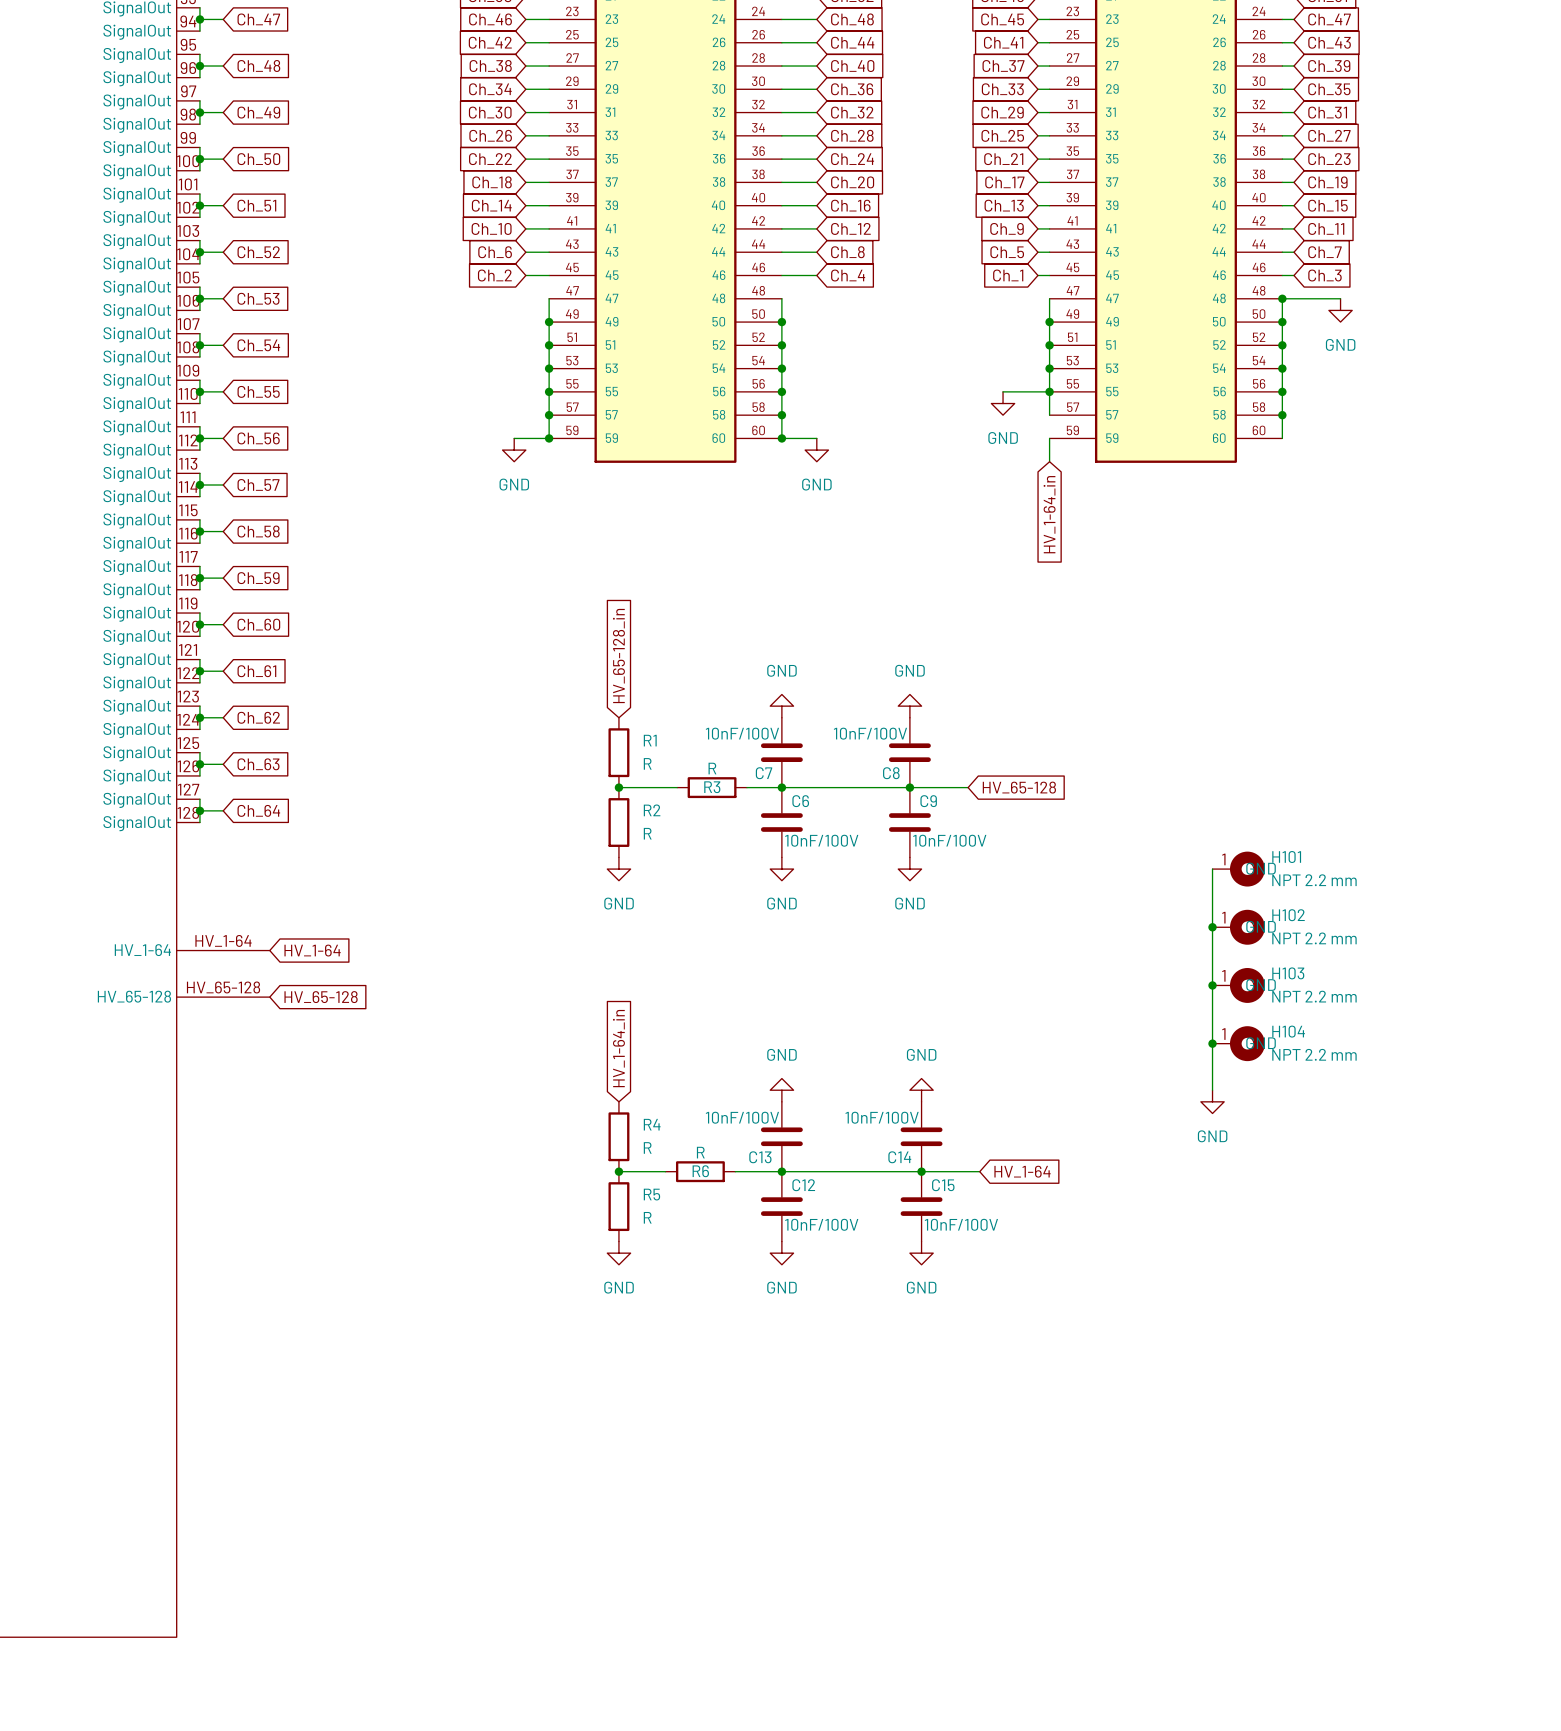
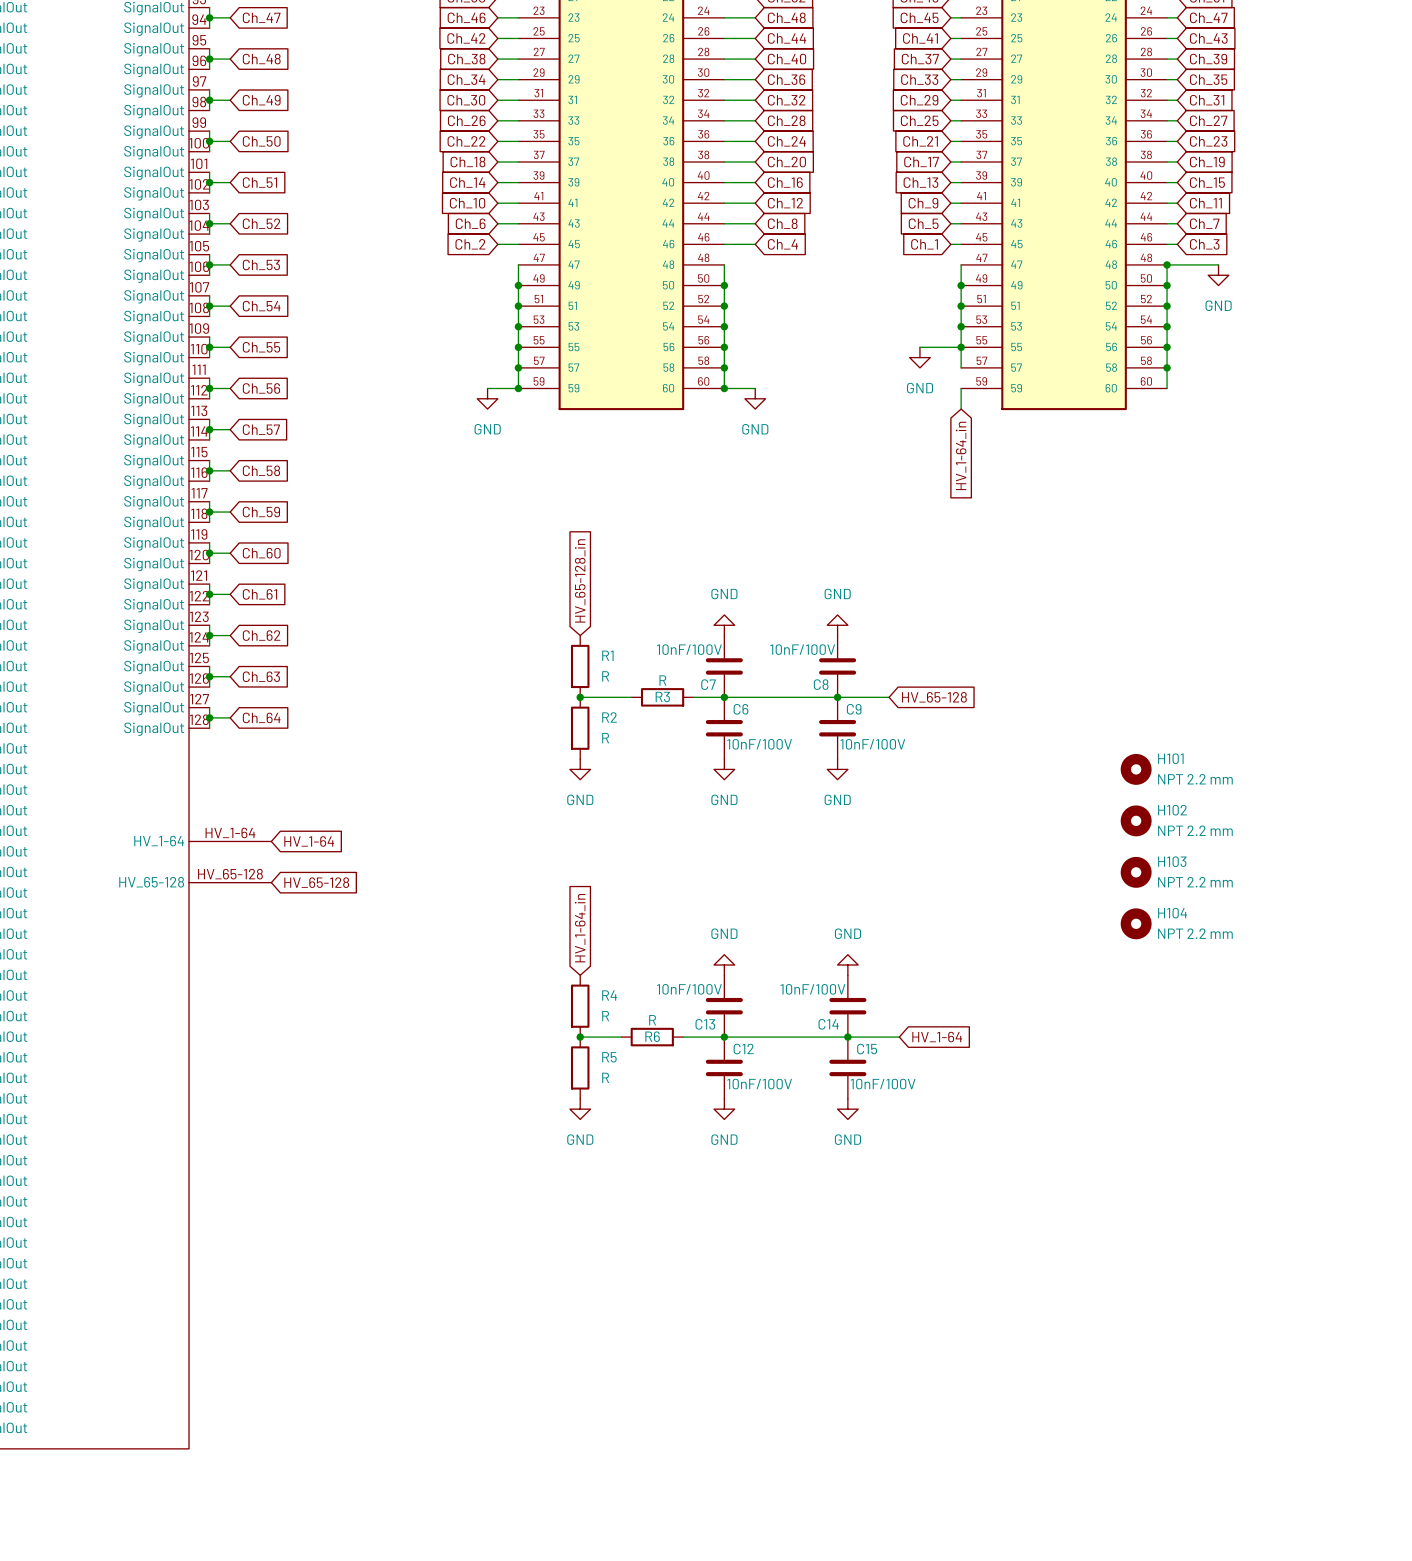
H101 symbol: [1212, 851, 1265, 887] -> [1120, 753, 1152, 785]
wire: (1212, 869) (1212, 1090) -> none
H102 symbol: [1212, 909, 1265, 945] -> [1120, 805, 1152, 837]
junction: (1212, 927) -> none
H103 symbol: [1212, 968, 1265, 1003] -> [1120, 856, 1152, 888]
junction: (1212, 985) -> none
H104 symbol: [1212, 1026, 1265, 1062] -> [1120, 908, 1152, 940]
junction: (1212, 1043) -> none
power symbol: GND (1212, 1101) -> none

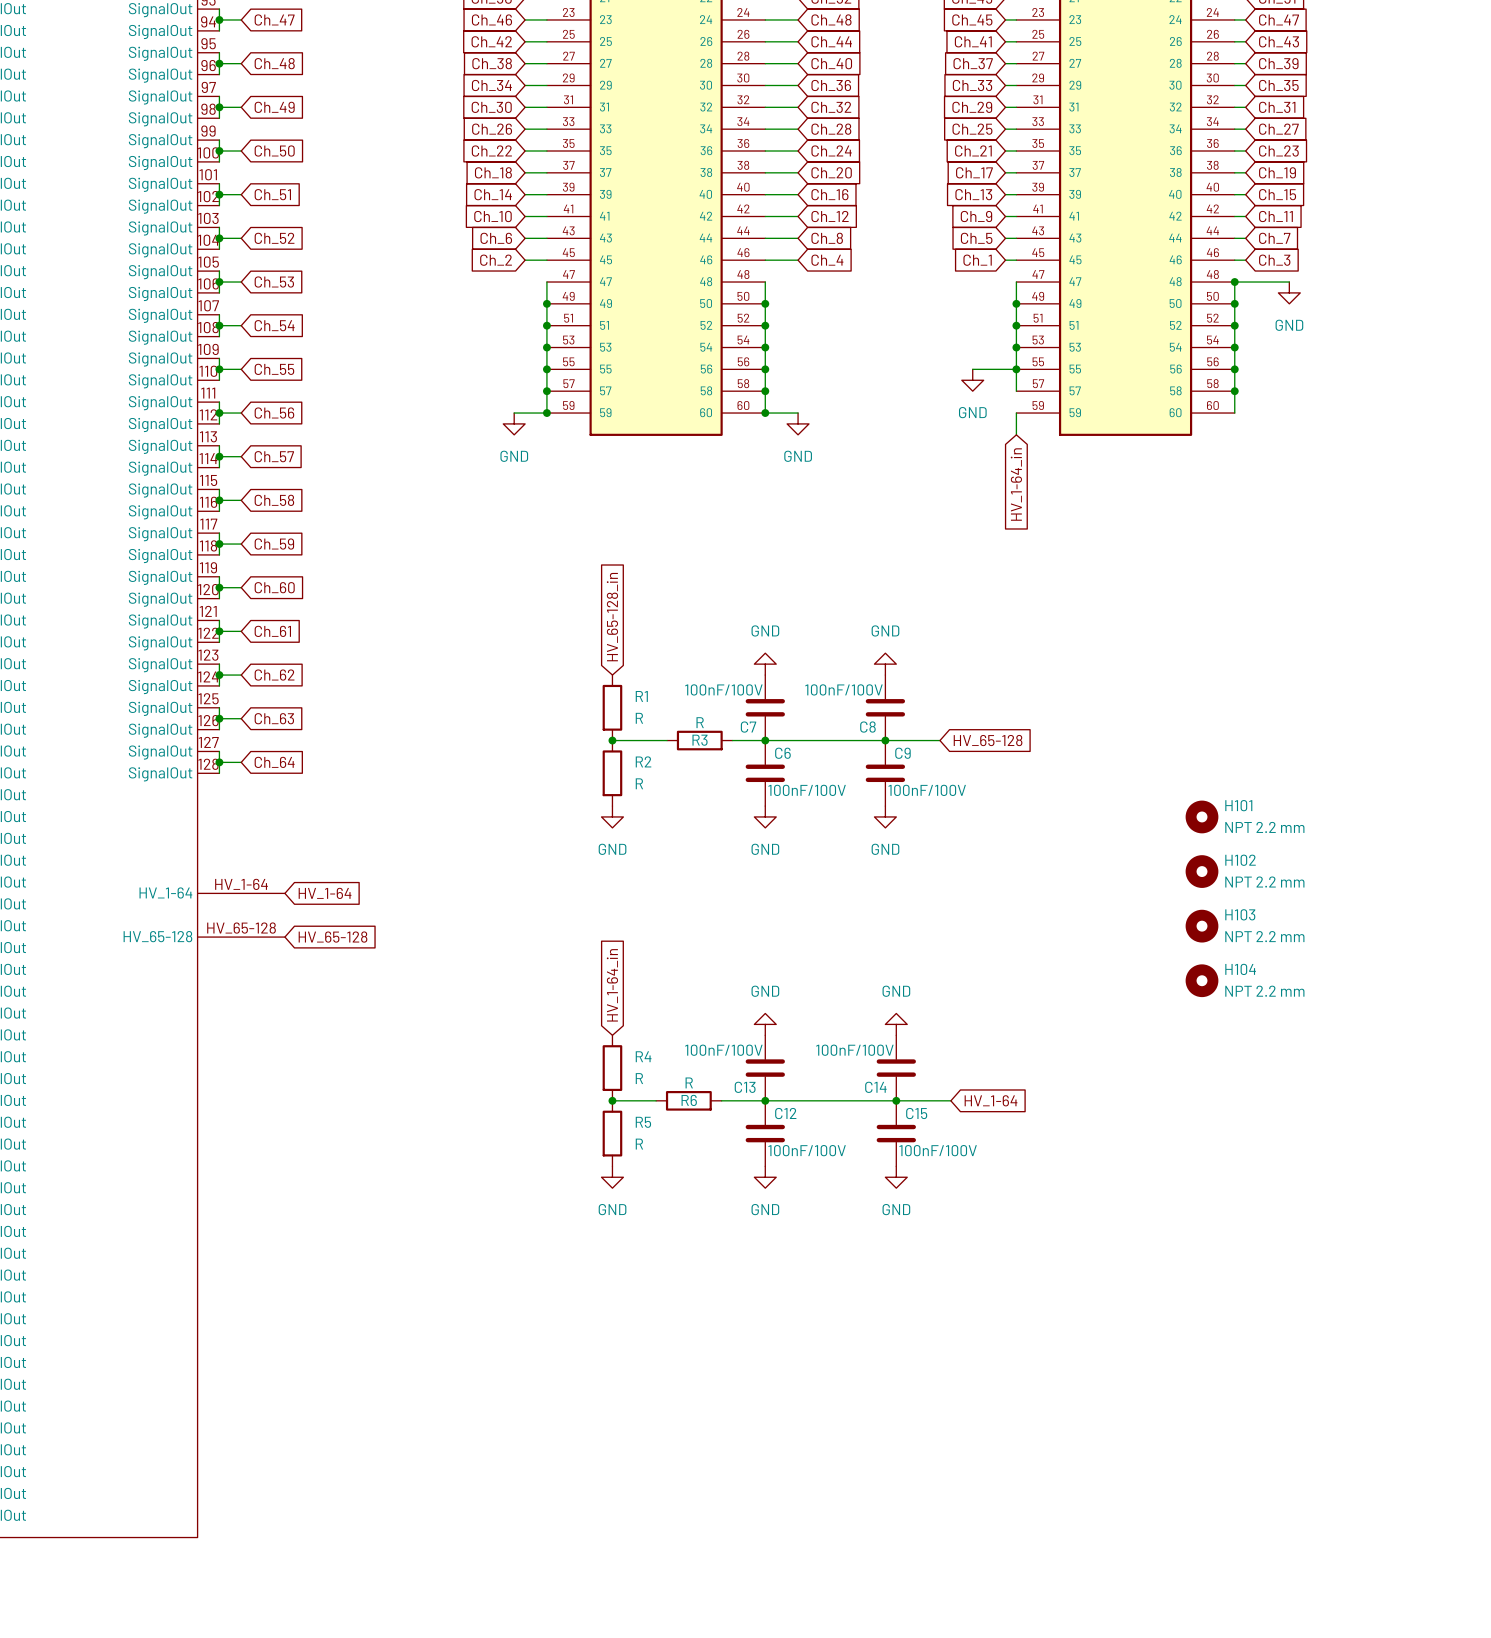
C7 value: 10nF/100V (689, 649) -> 100nF/100V (723, 689)
C8 value: 10nF/100V (802, 649) -> 100nF/100V (843, 689)
C6 value: 10nF/100V (759, 744) -> 100nF/100V (807, 790)
C9 value: 10nF/100V (872, 744) -> 100nF/100V (927, 790)
C13 value: 10nF/100V (689, 989) -> 100nF/100V (723, 1050)
C14 value: 10nF/100V (812, 989) -> 100nF/100V (854, 1050)
C12 value: 10nF/100V (759, 1084) -> 100nF/100V (807, 1150)
C15 value: 10nF/100V (883, 1084) -> 100nF/100V (938, 1150)

